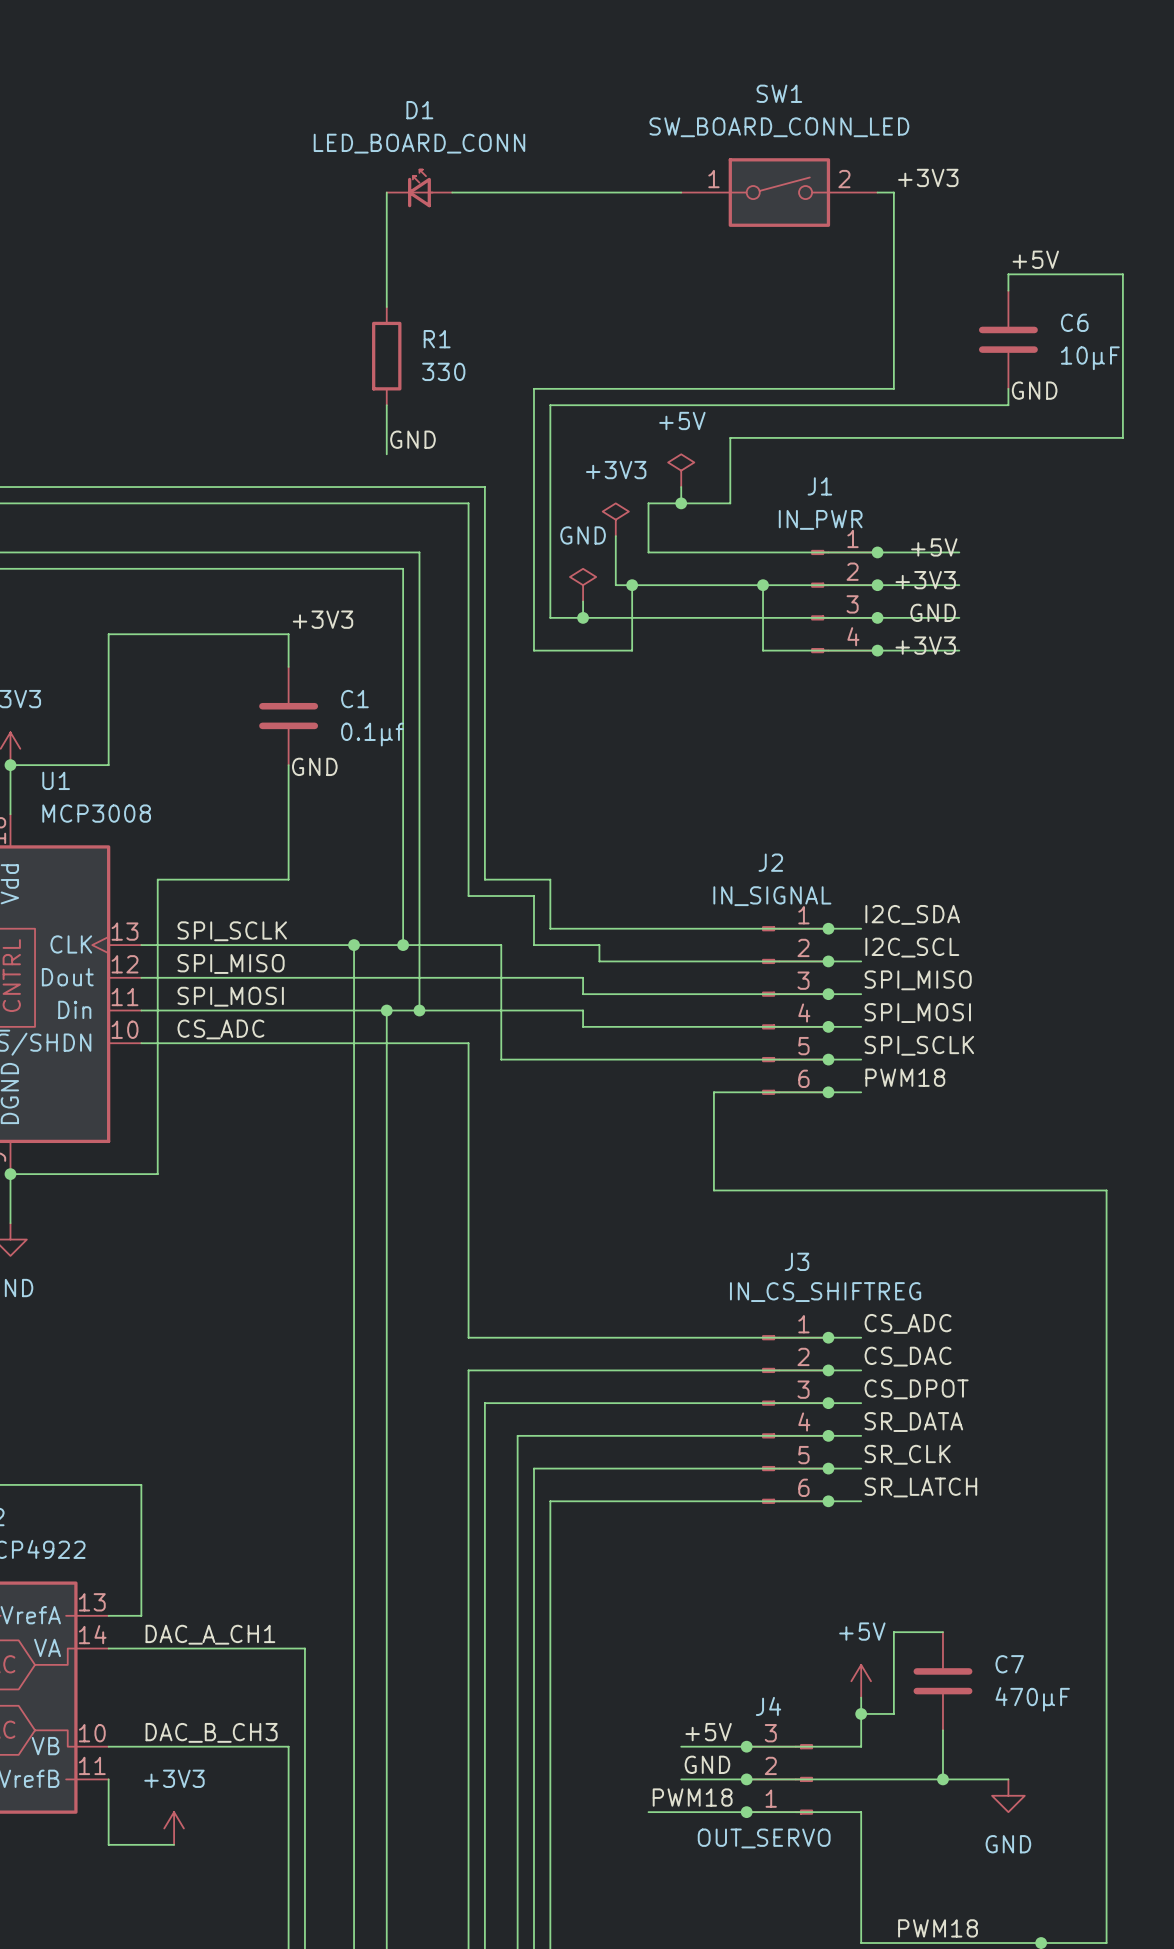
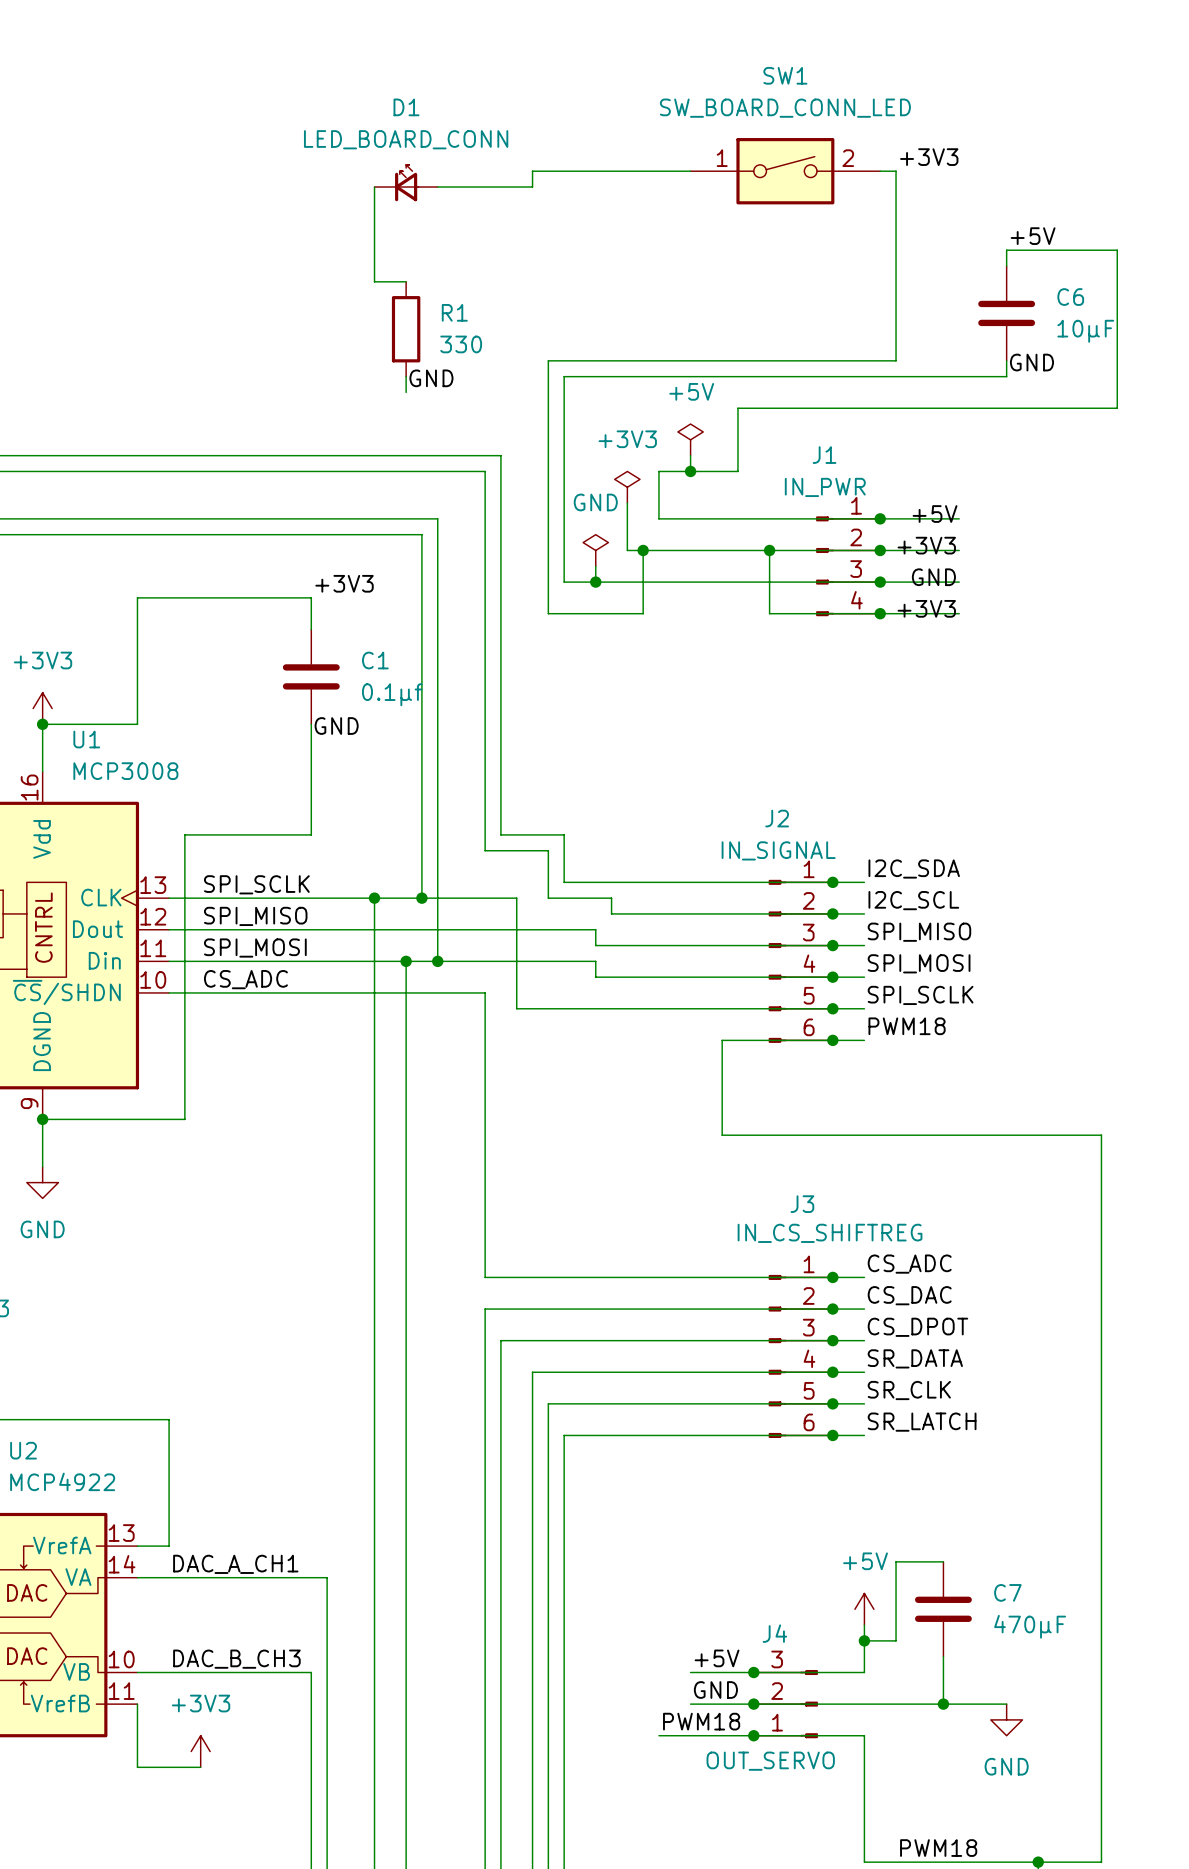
D1 position: (419, 188) -> (406, 183)
wire: (386, 192) (386, 307) -> (374, 187) (374, 281) (406, 281)
wire: (452, 192) (517, 192) -> (437, 187) (532, 187) (532, 171)
wire: (386, 421) (386, 454) -> none
label position: GND (412, 439) -> GND (431, 378)

